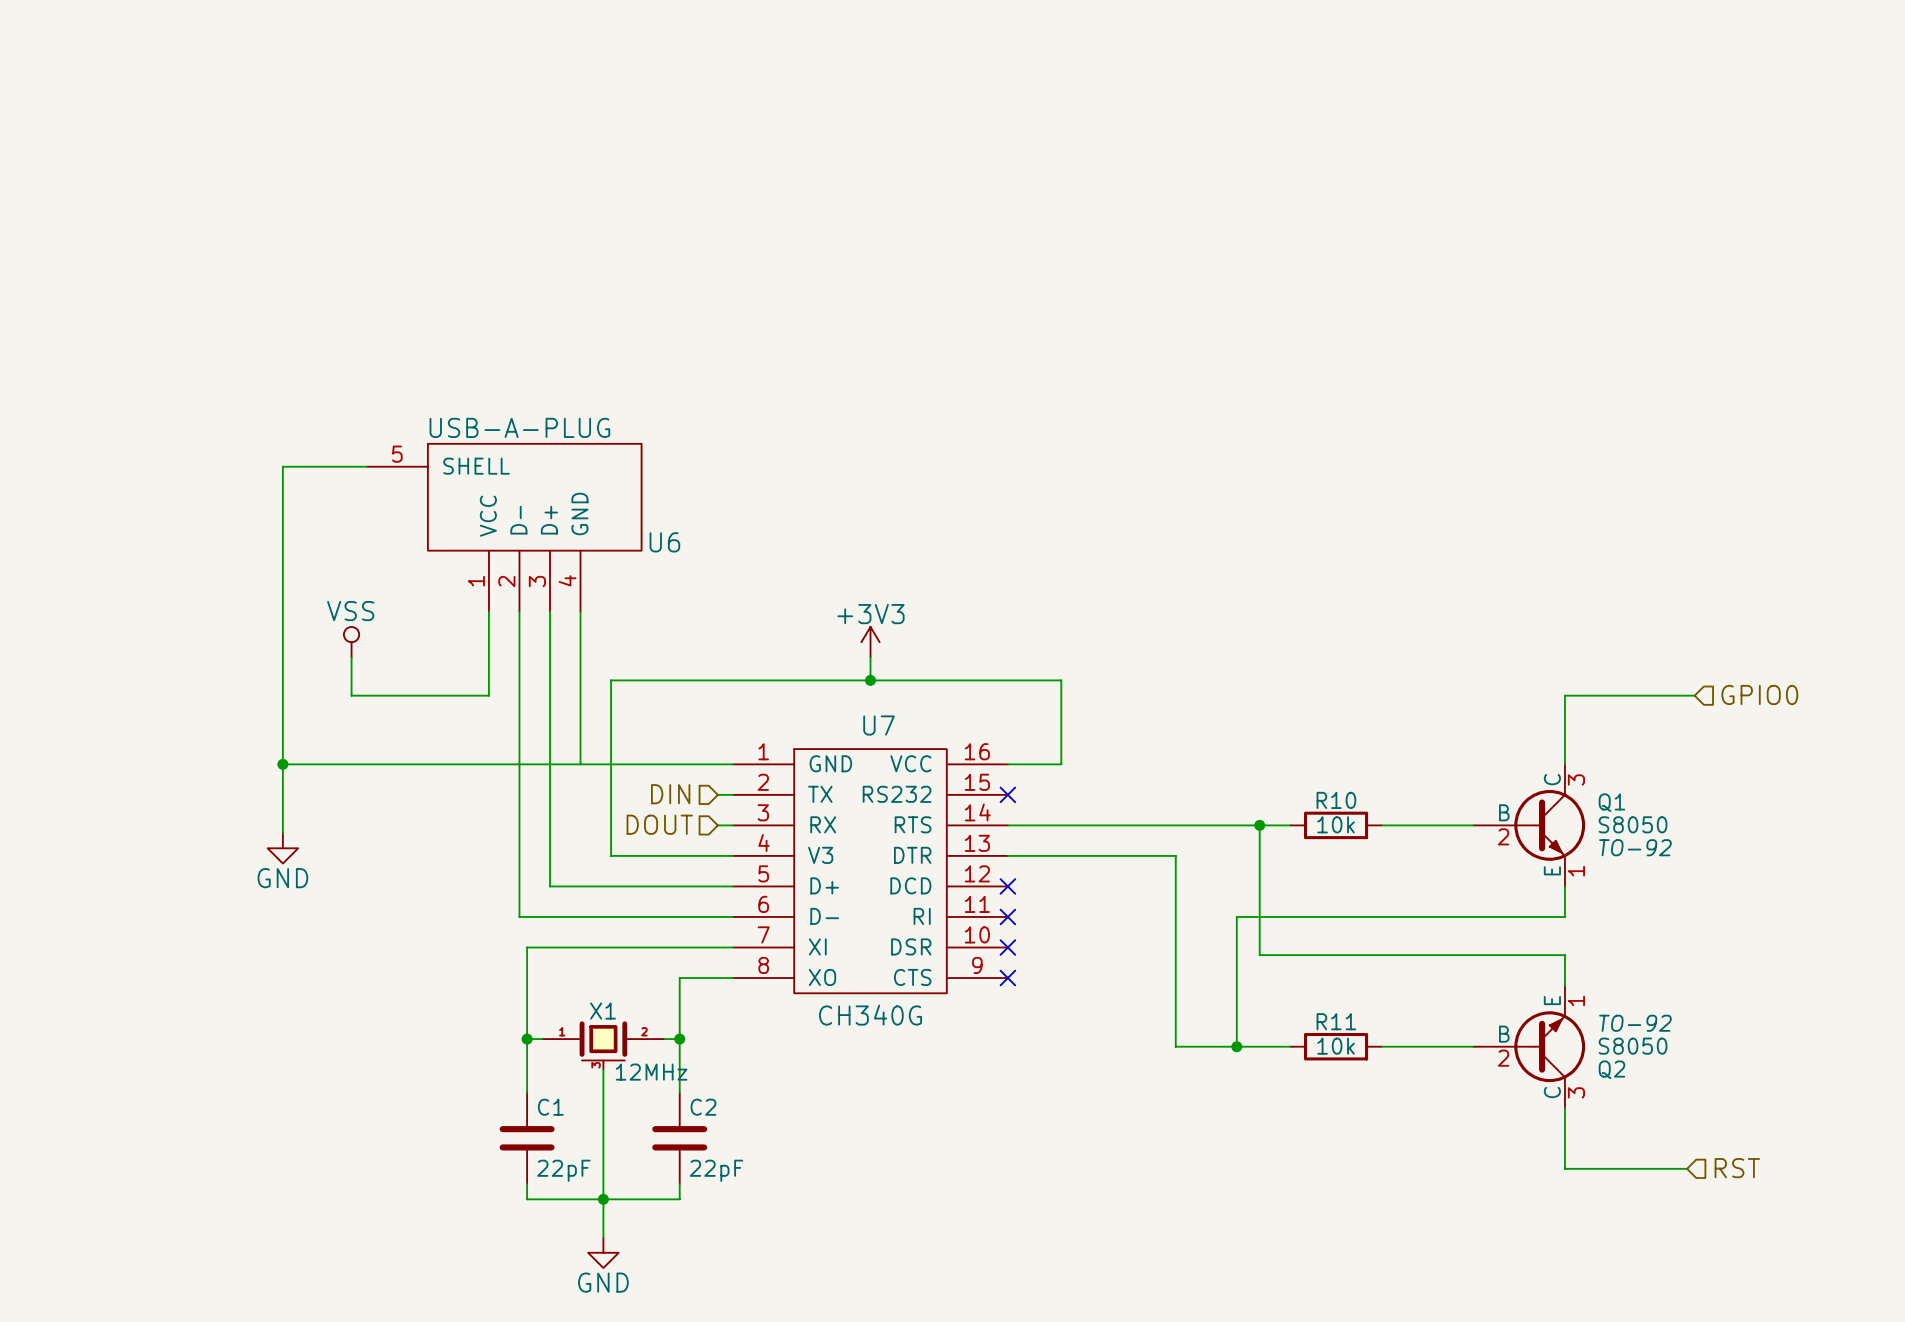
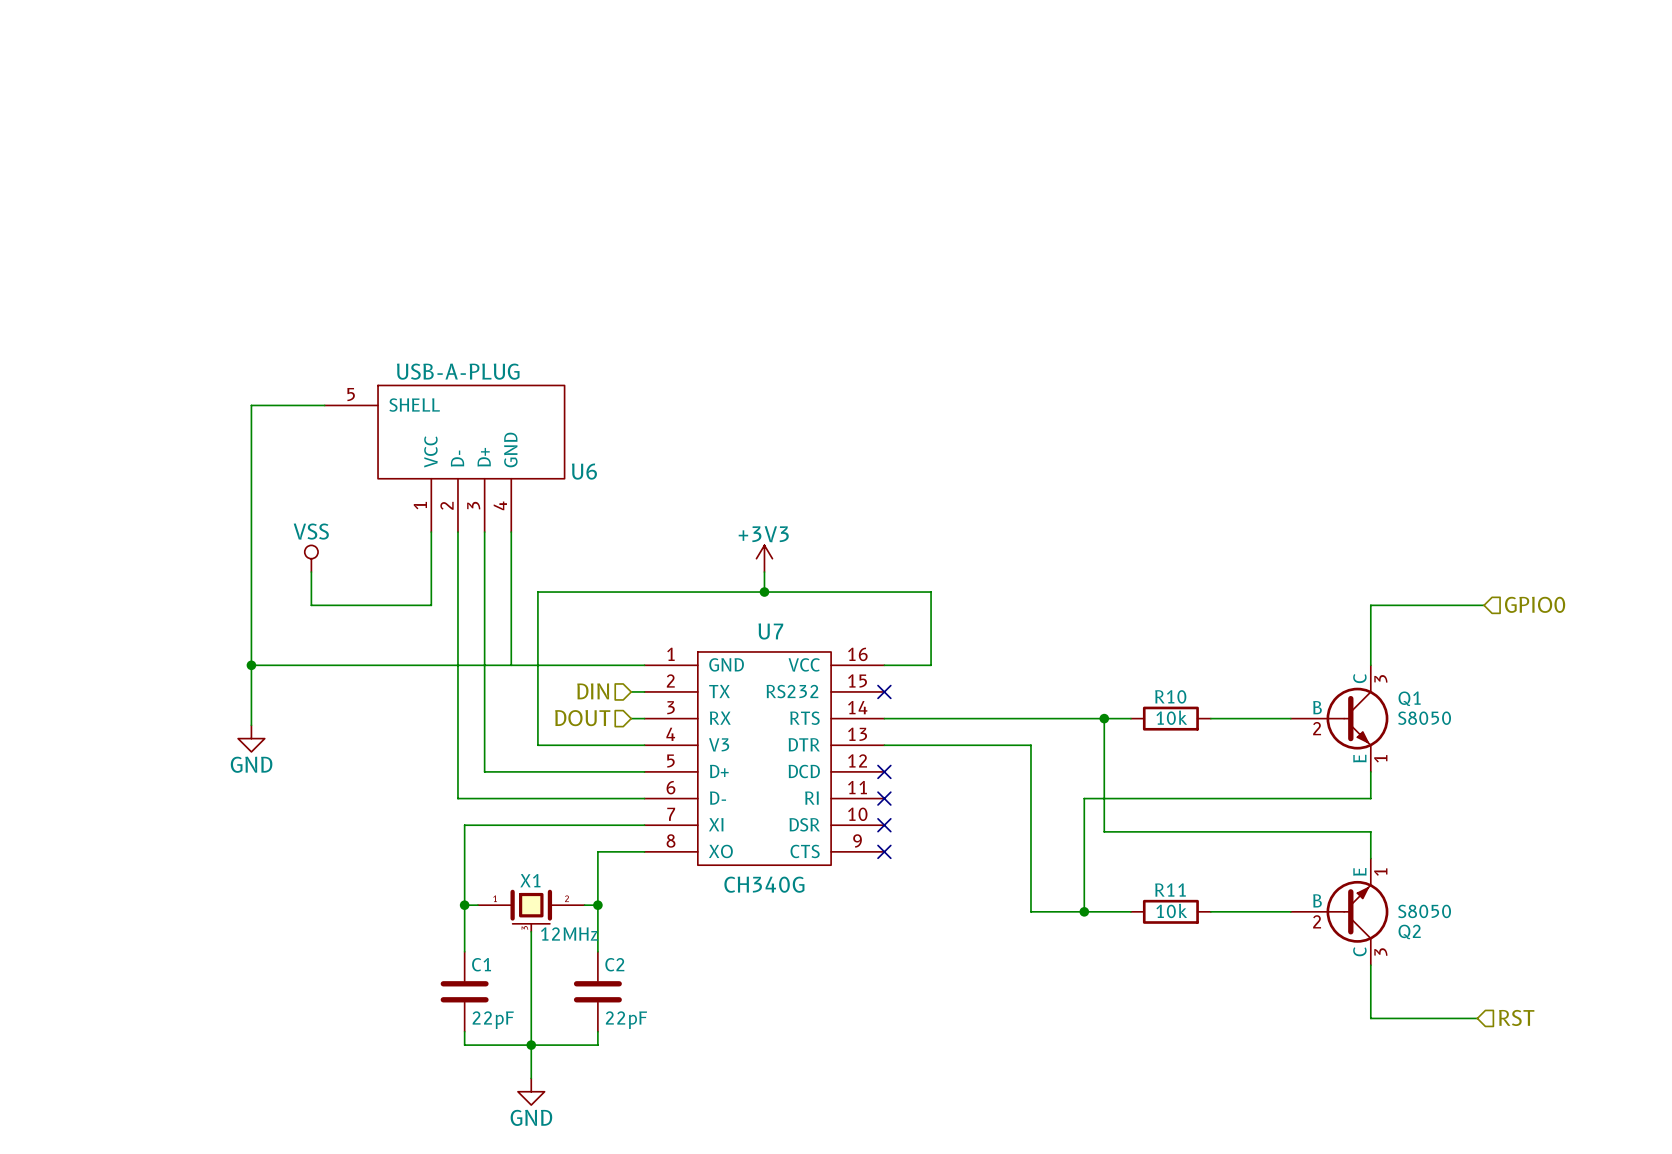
Q1 text: TO-92 (1635, 847) -> none
Q2 text: TO-92 (1635, 1023) -> none

